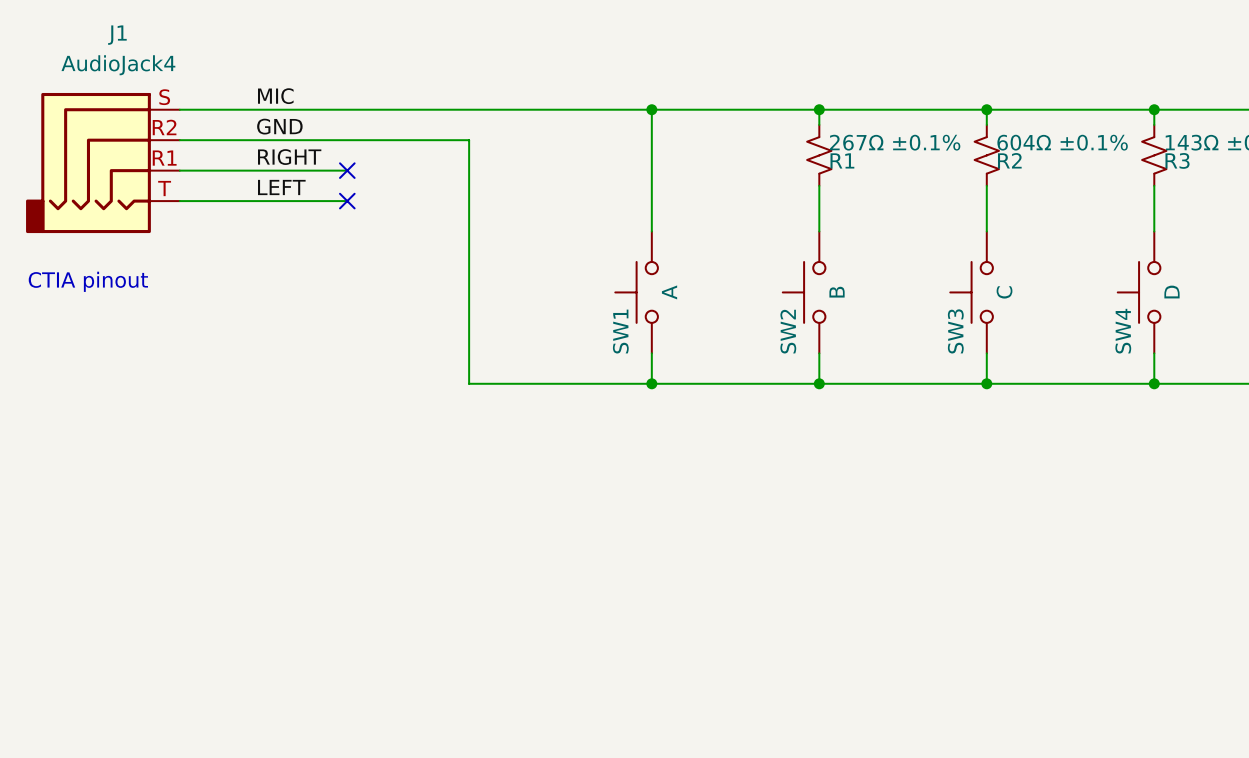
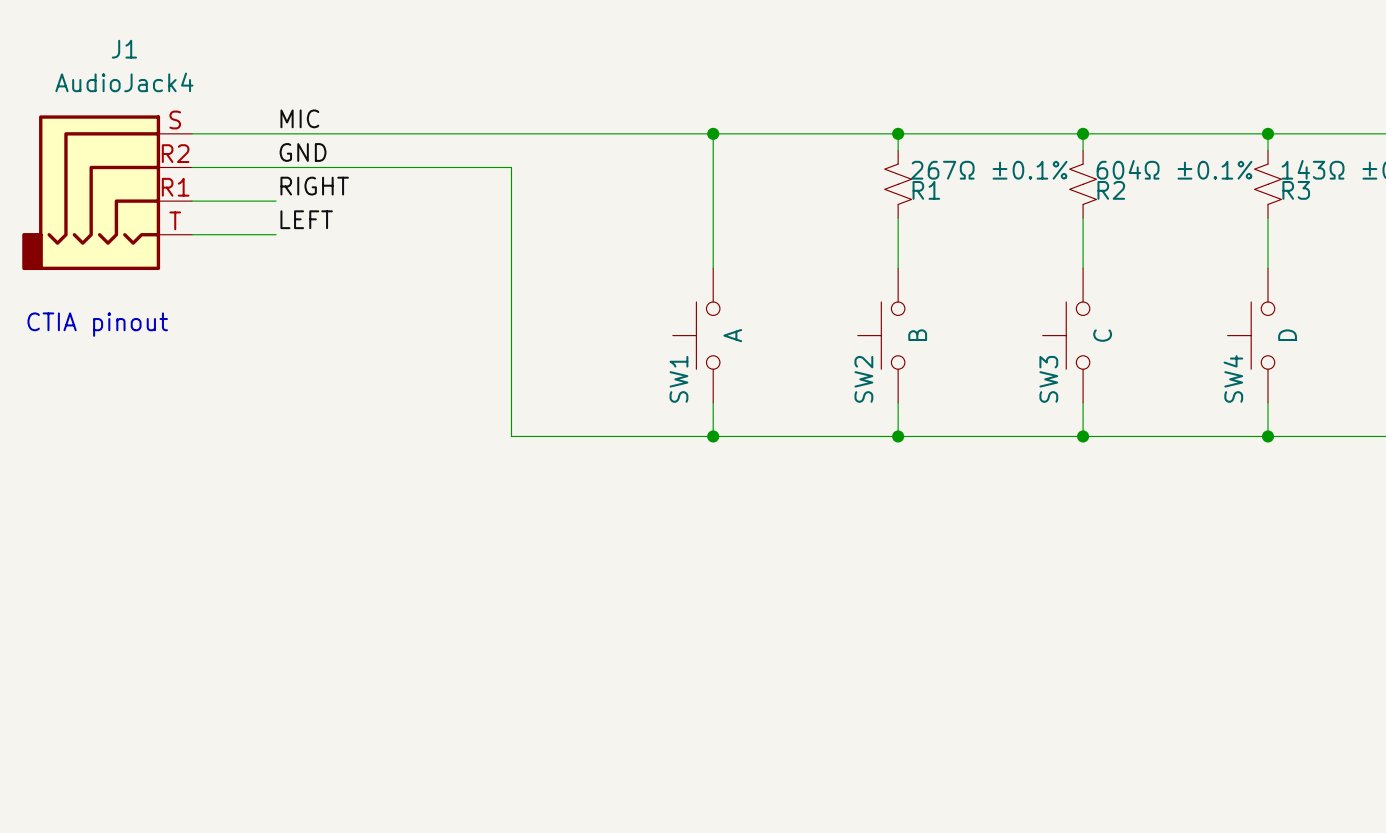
wire: (255, 170) (347, 170) -> none
no-connect mark: (347, 170) -> none
wire: (255, 201) (347, 201) -> none
no-connect mark: (347, 201) -> none

